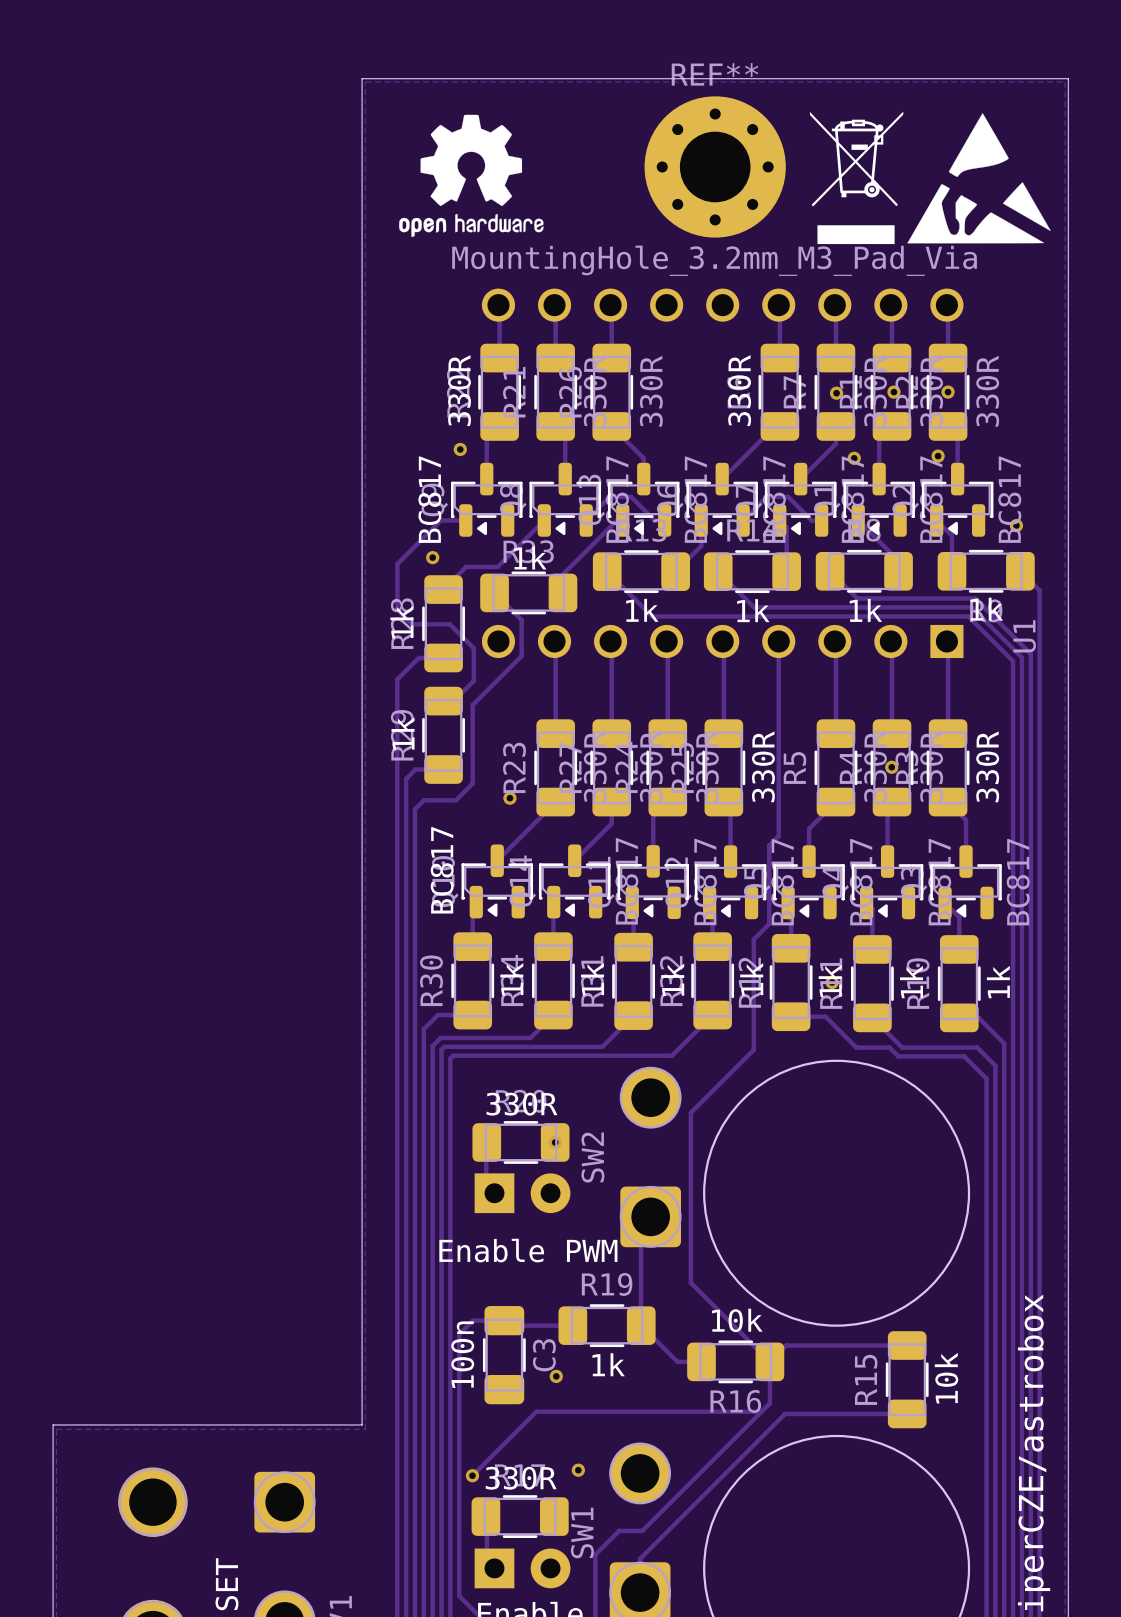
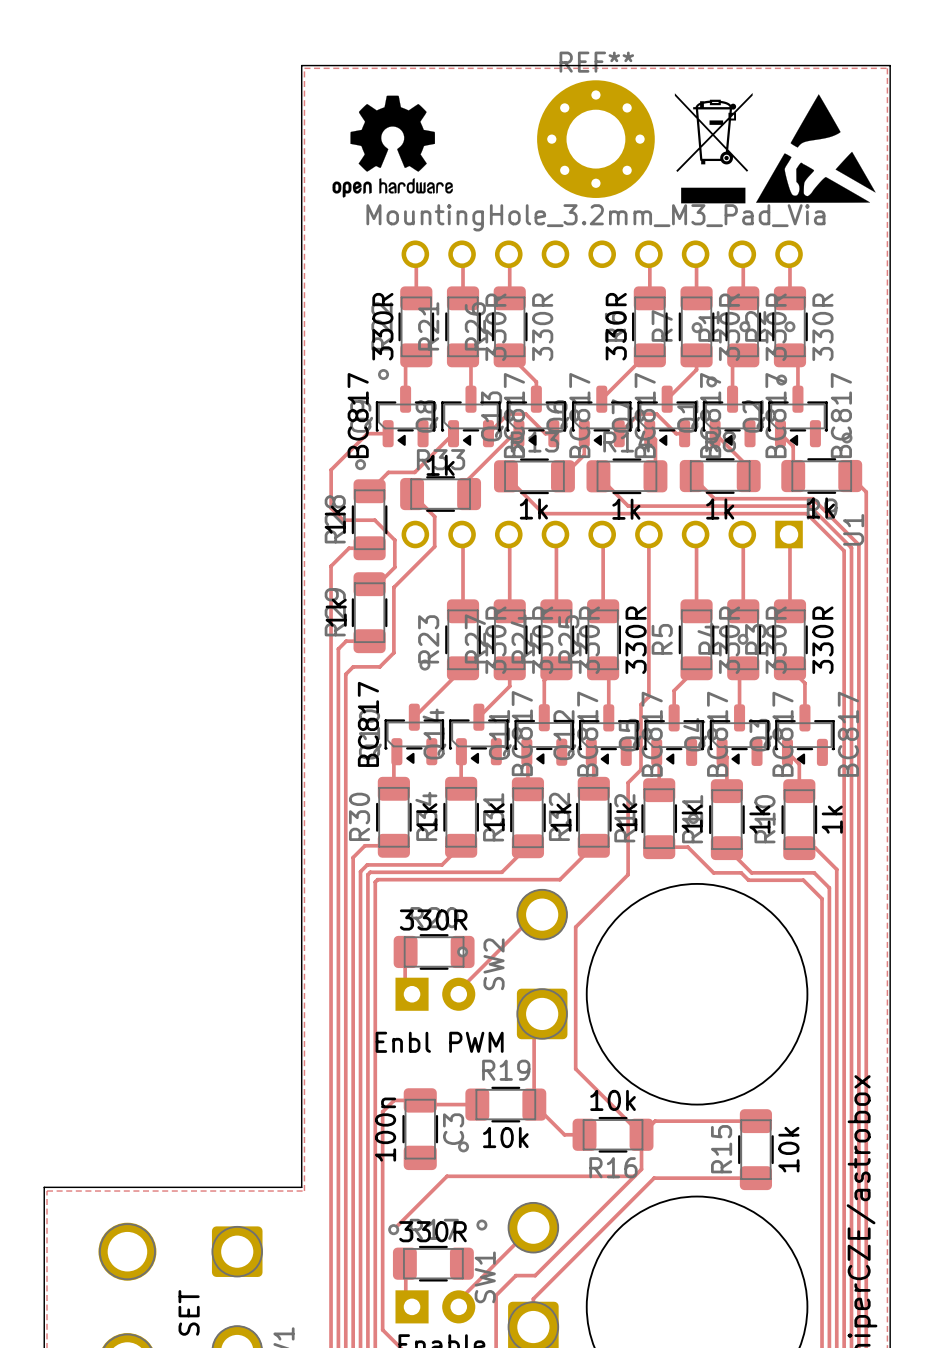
track: none -> (534, 915) (455, 994)
SW2 value: Enable PWM (528, 1250) -> Enbl PWM (439, 1042)
R19 value: 1k (608, 1364) -> 10k (505, 1137)
track: none -> (531, 1227) (452, 1306)

